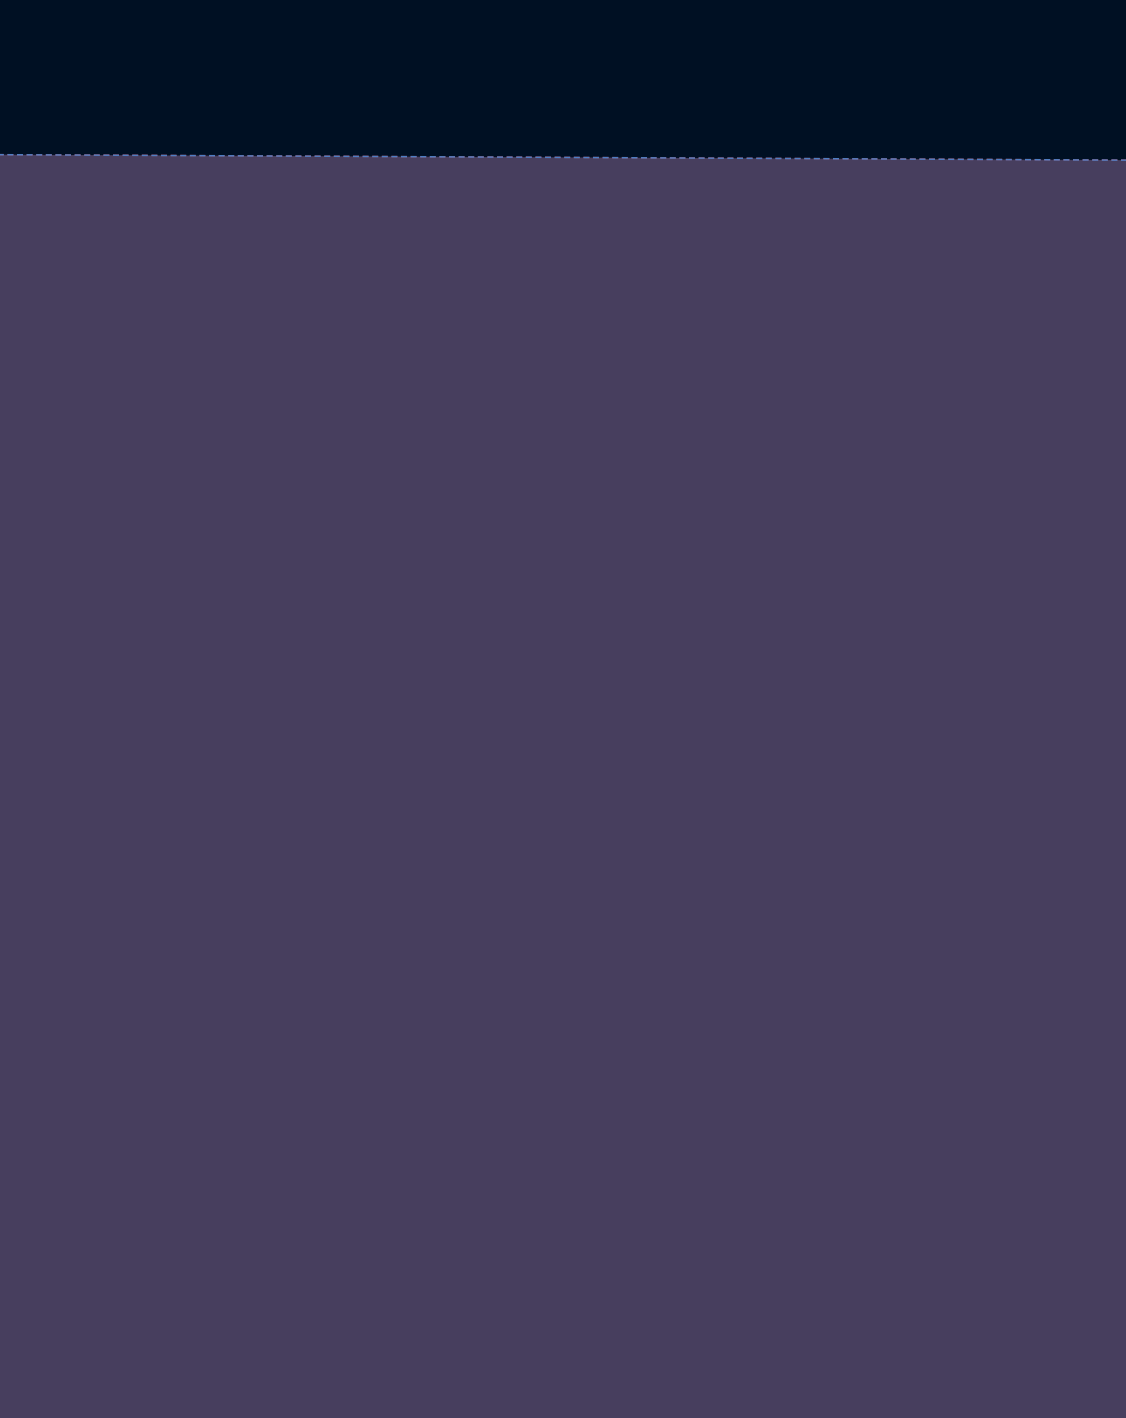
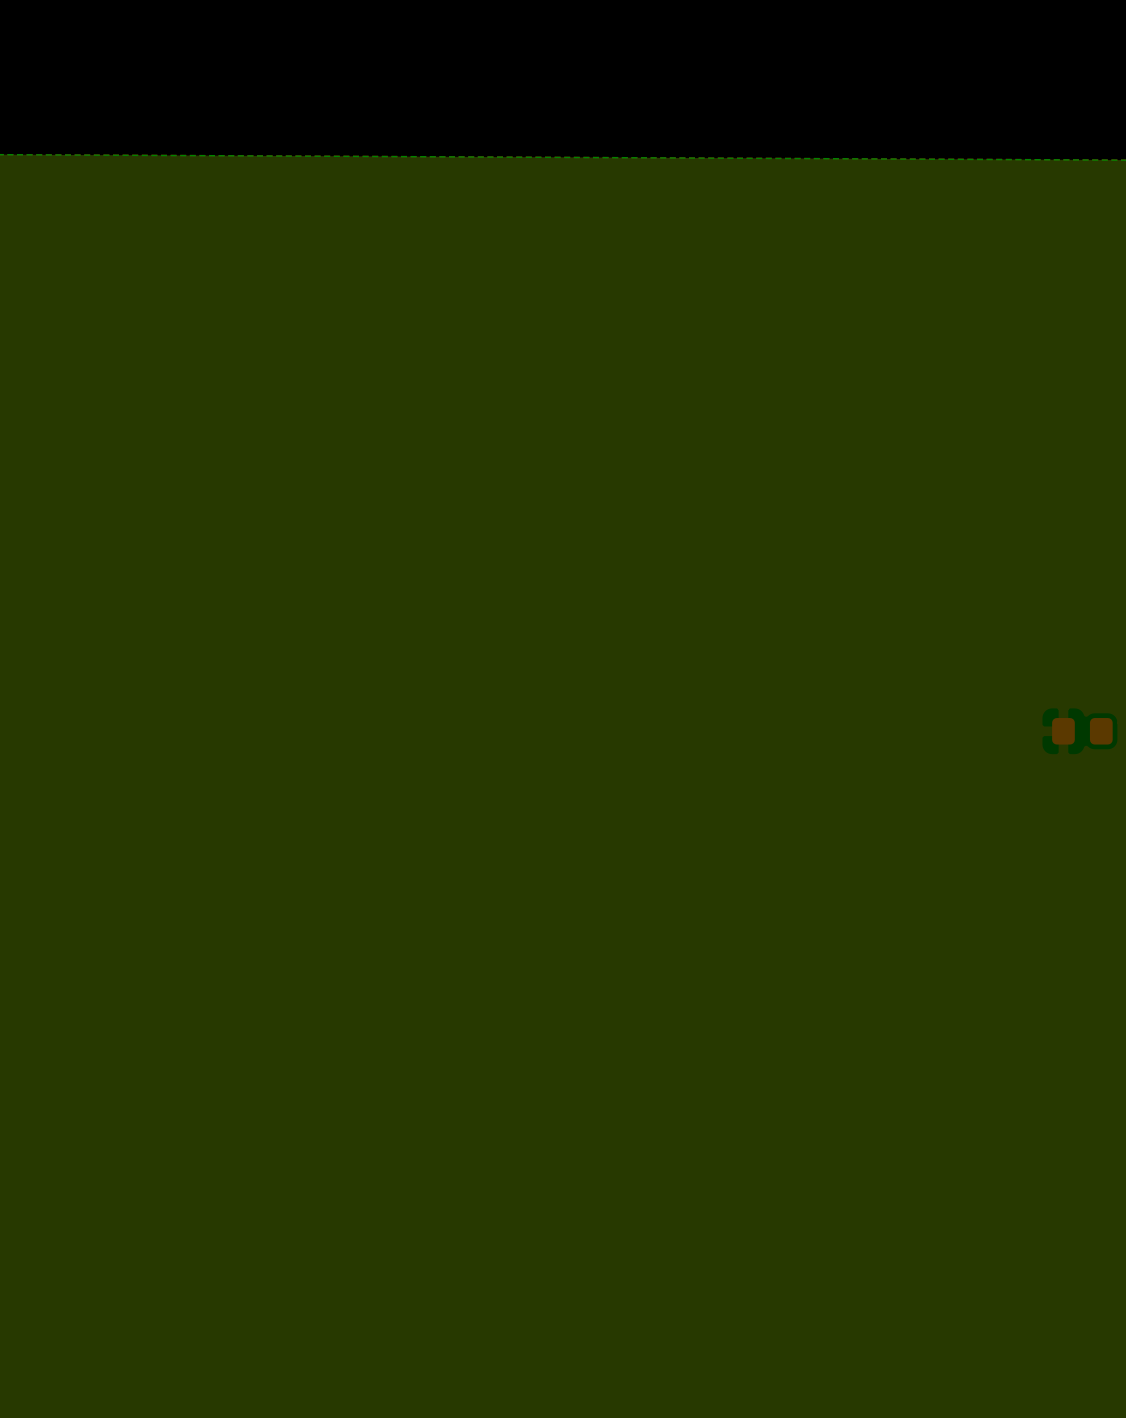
part: none -> (1082, 731)

